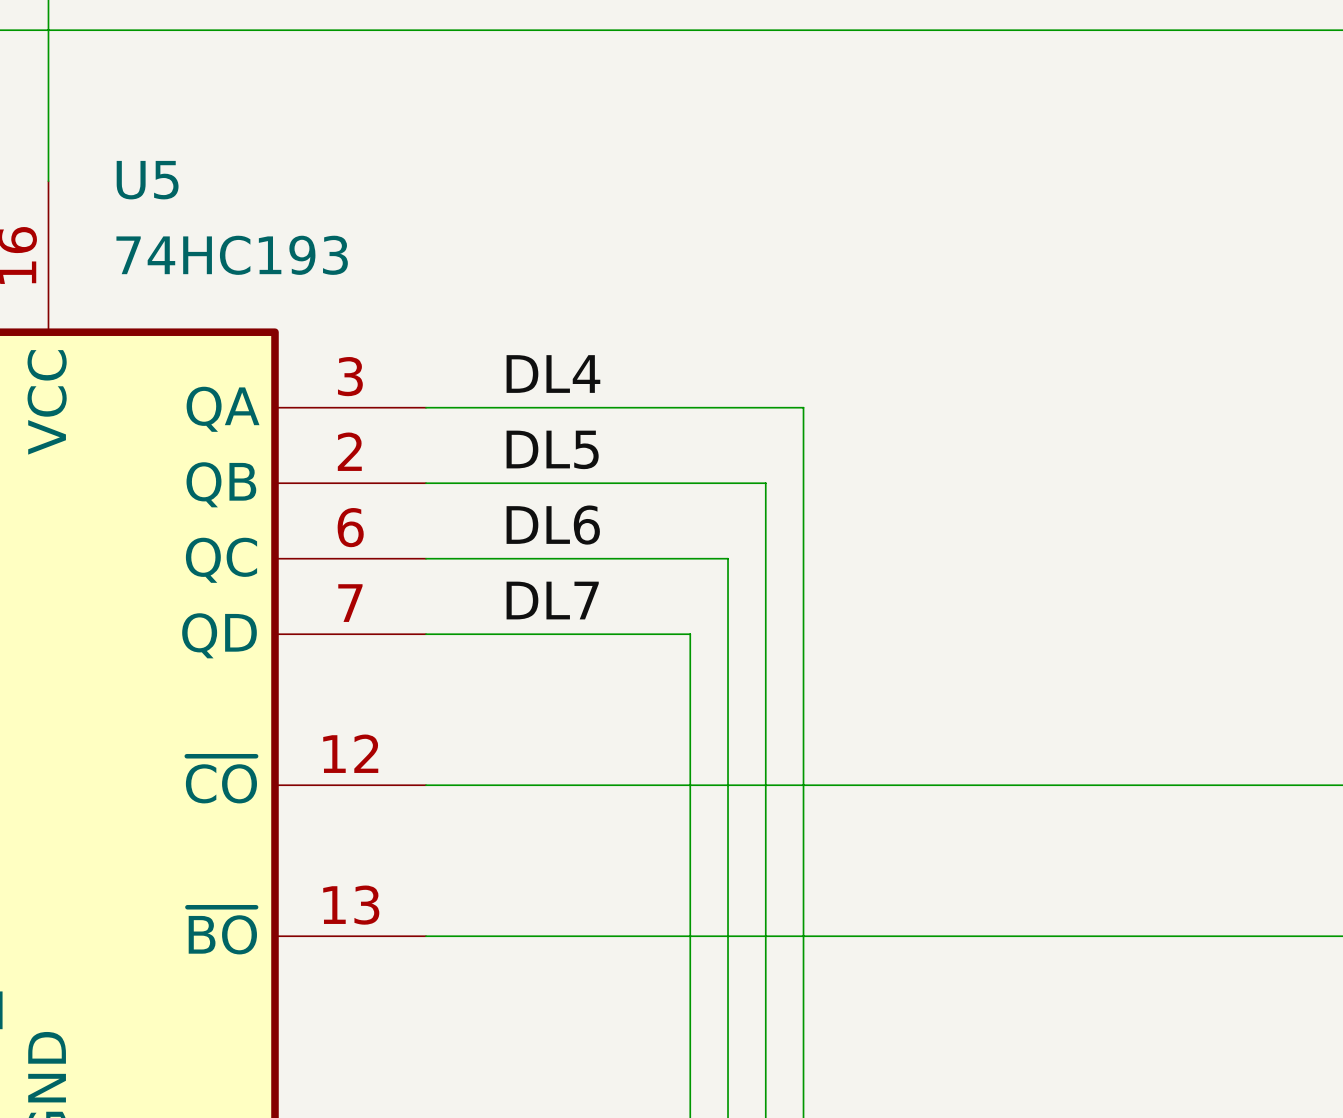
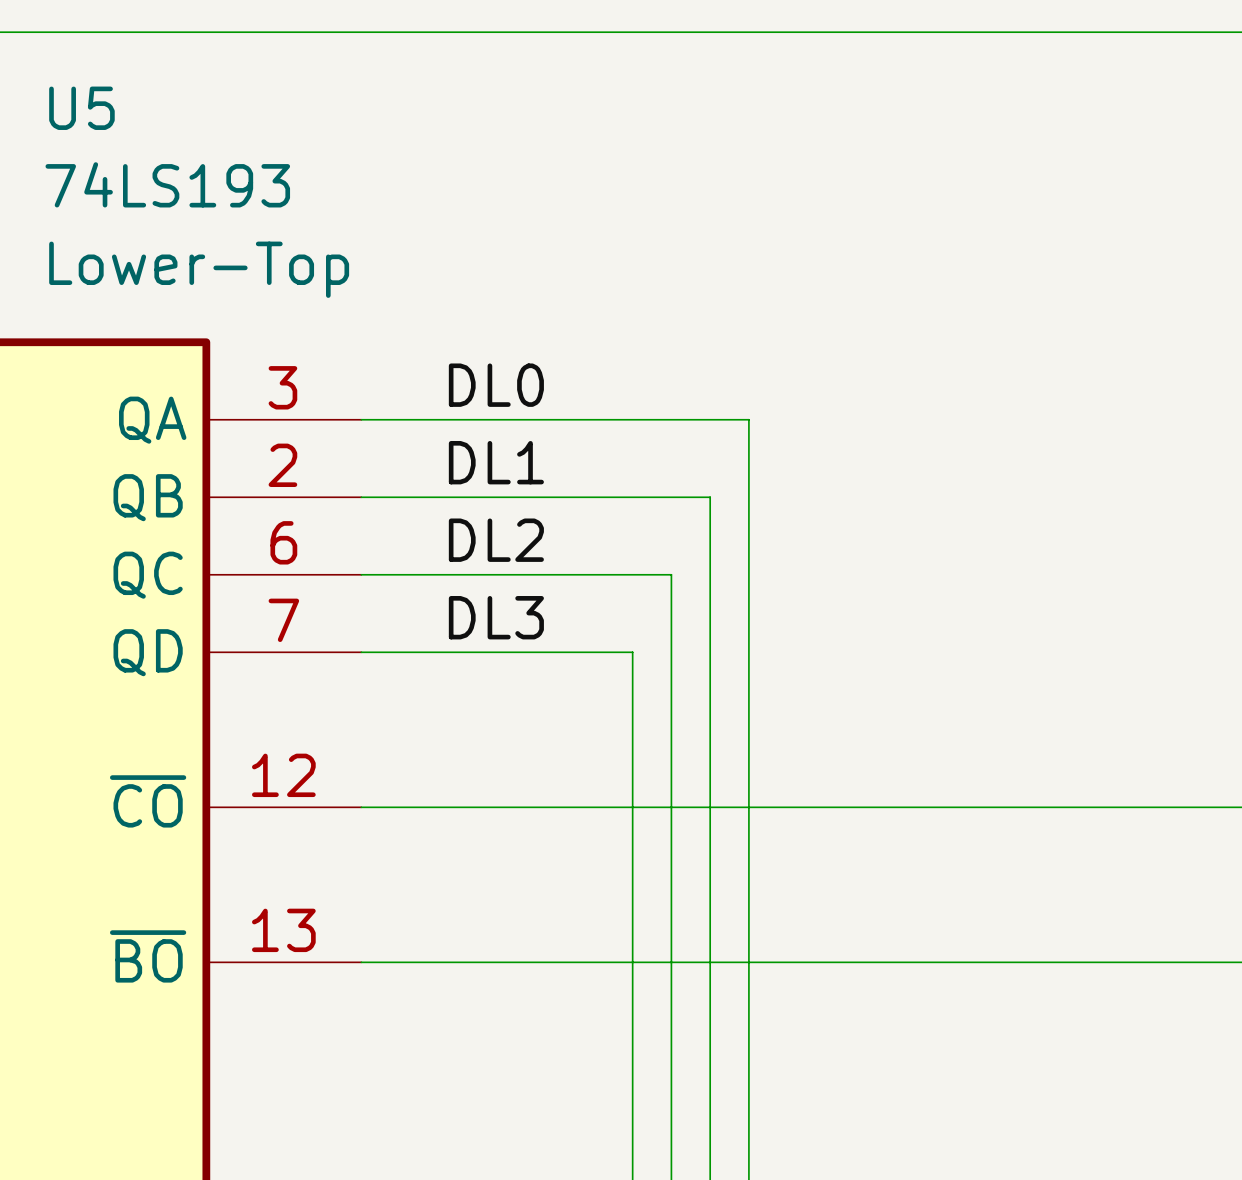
U5 name position: U5 (147, 180) -> U5 (81, 108)
U5 value: 74HC193 (232, 255) -> 74LS193 (167, 184)
U5 text: none -> Lower-Top (199, 269)
label: DL4 (553, 374) -> DL0 (496, 385)
label: DL5 (552, 449) -> DL1 (496, 462)
label: DL6 (553, 525) -> DL2 (496, 540)
label: DL7 (552, 600) -> DL3 (496, 617)

